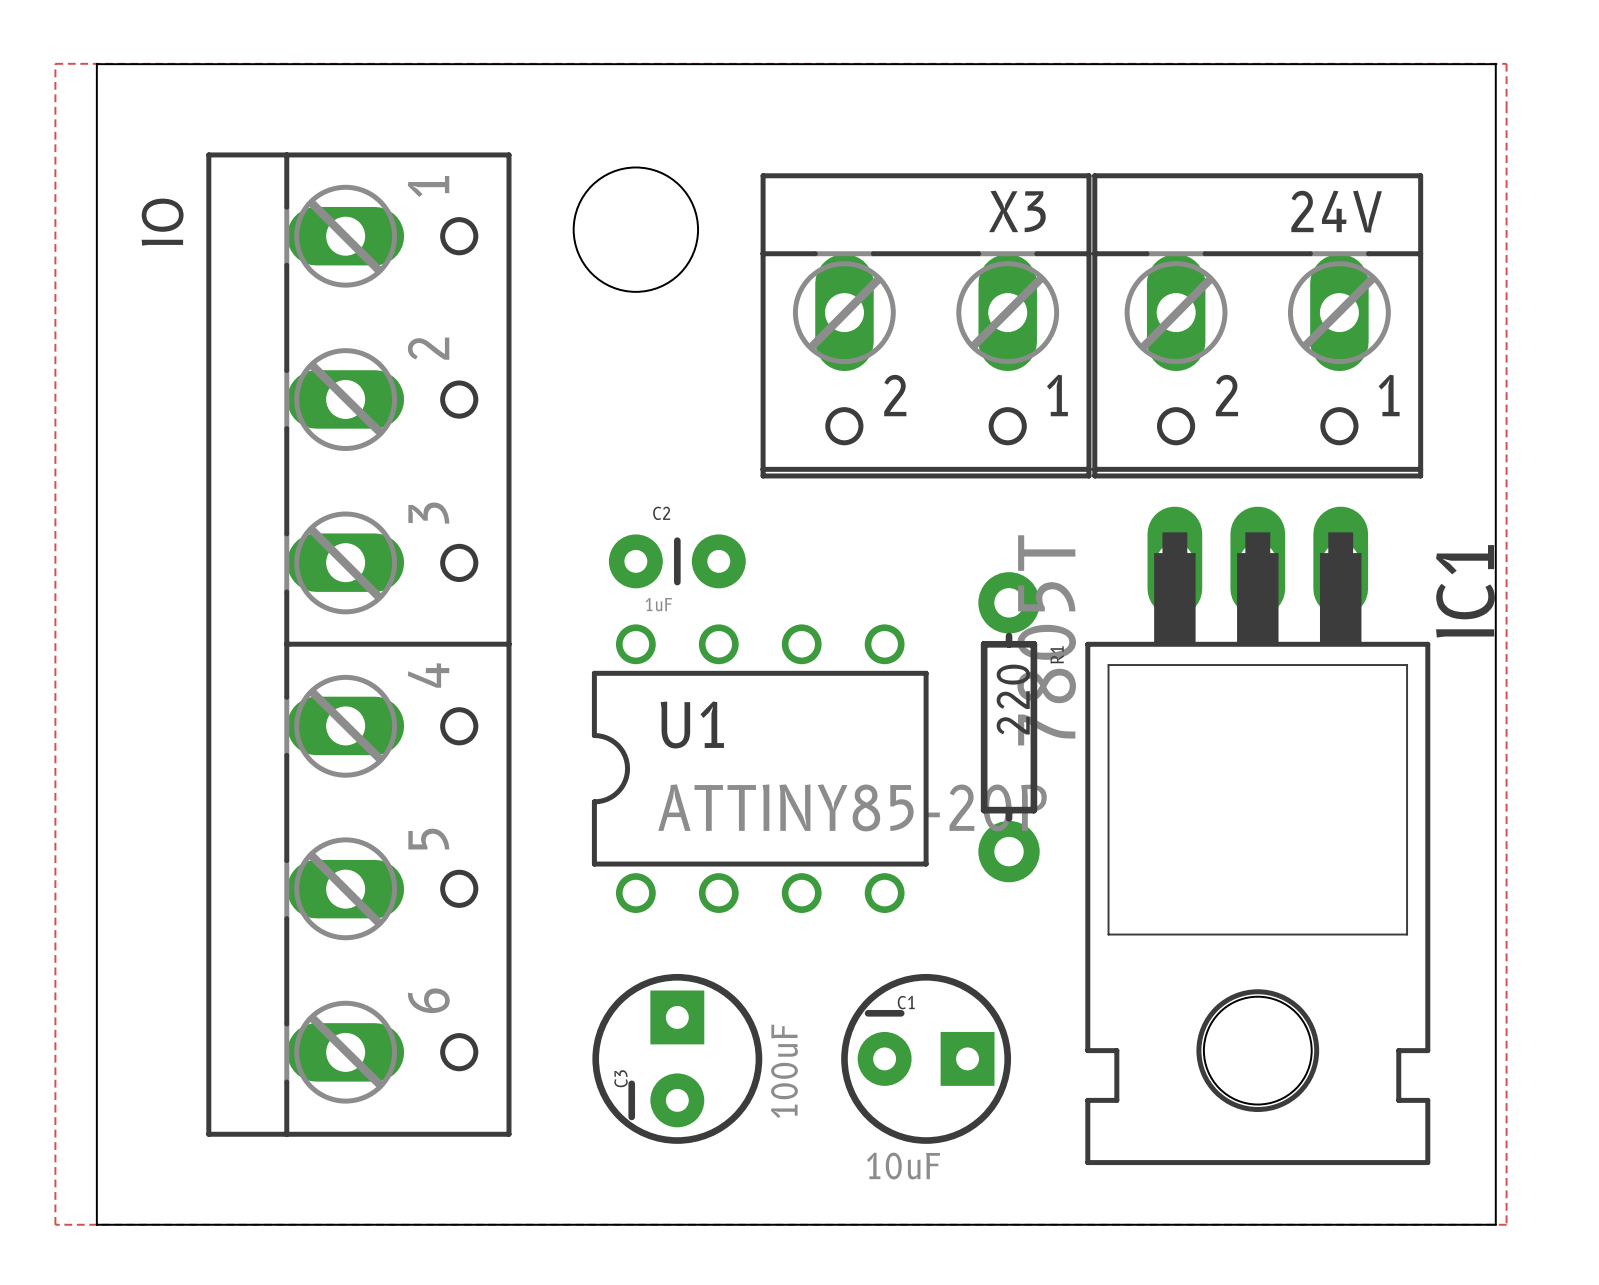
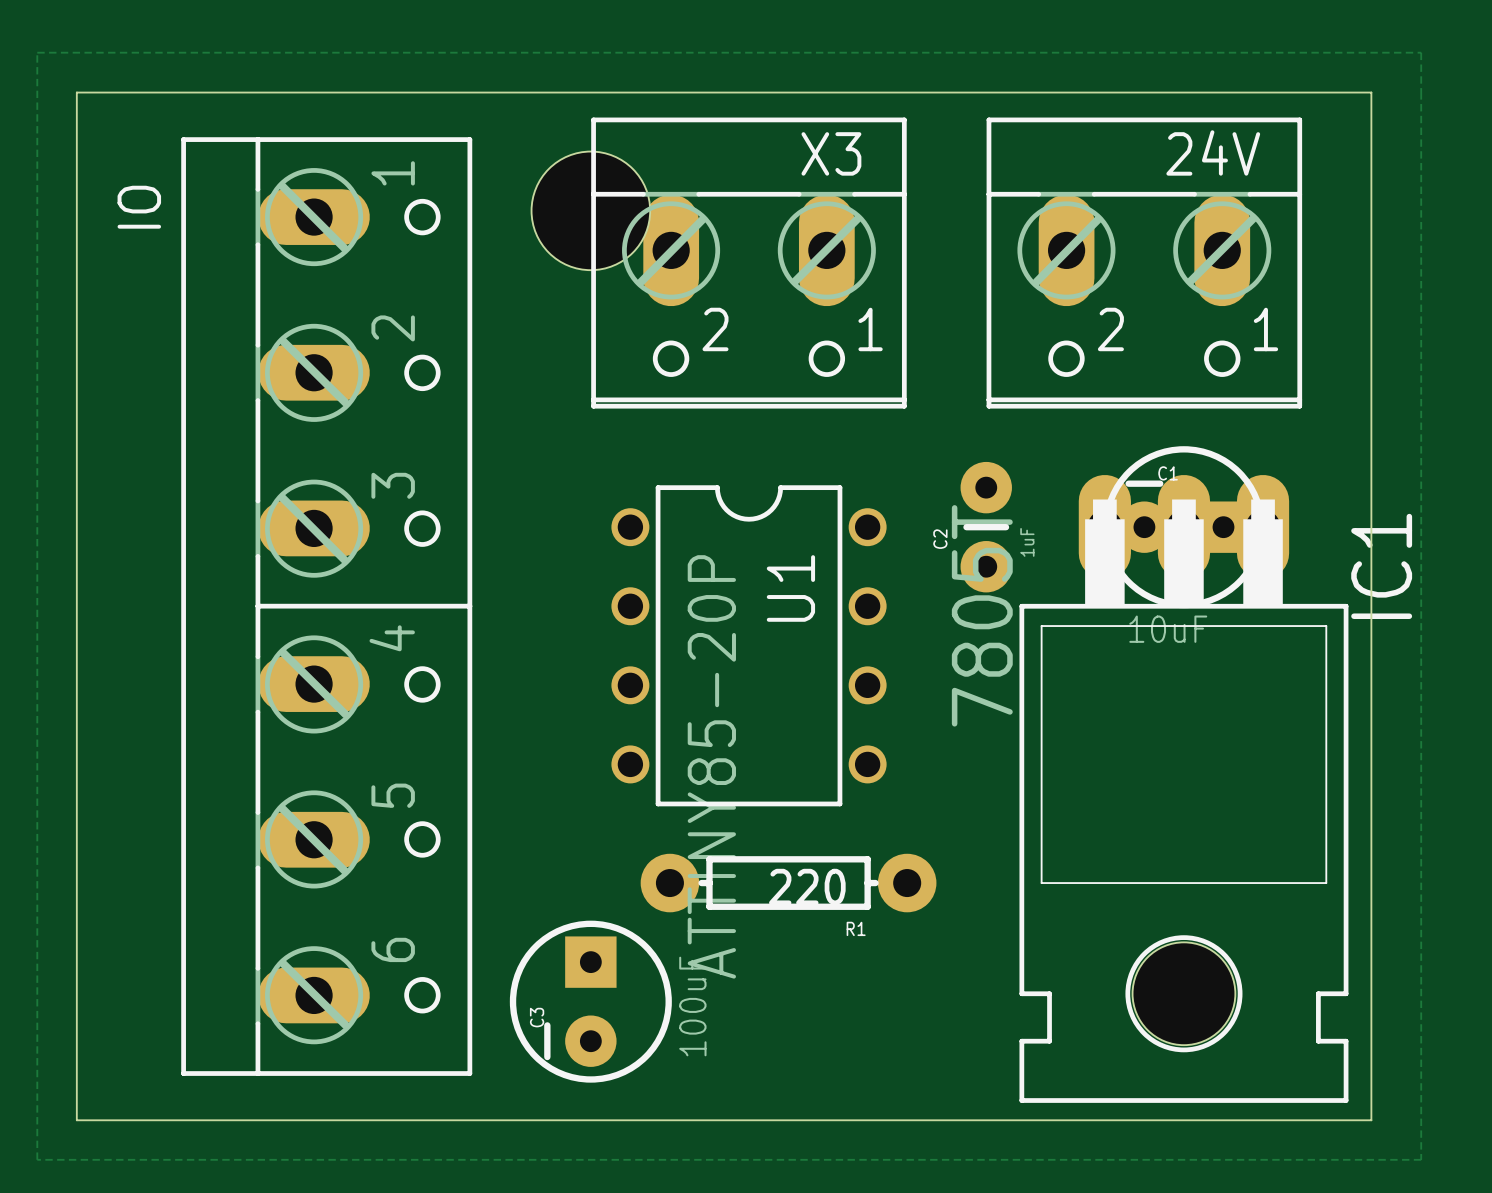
board edge: (96, 105) (96, 64) (1495, 64) (1495, 1224) (96, 1224) (96, 1183) -> (76, 92) (1371, 92) (1371, 1120) (76, 1120)
X3 position: (926, 325) -> (748, 263)
24V position: (1257, 325) -> (1144, 263)
C2 name position: C2 (661, 513) -> C2 (940, 539)
C2 rotation: 0° (677, 561) -> 90° clockwise (986, 527)
C2 position: (677, 561) -> (986, 527)
R1 rotation: 0° (1009, 727) -> 90° clockwise (788, 883)
R1 position: (1009, 727) -> (788, 883)
U1 rotation: 0° (760, 768) -> 90° clockwise (749, 645)
C3 position: (677, 1058) -> (590, 1001)
C1 position: (926, 1058) -> (1183, 527)

